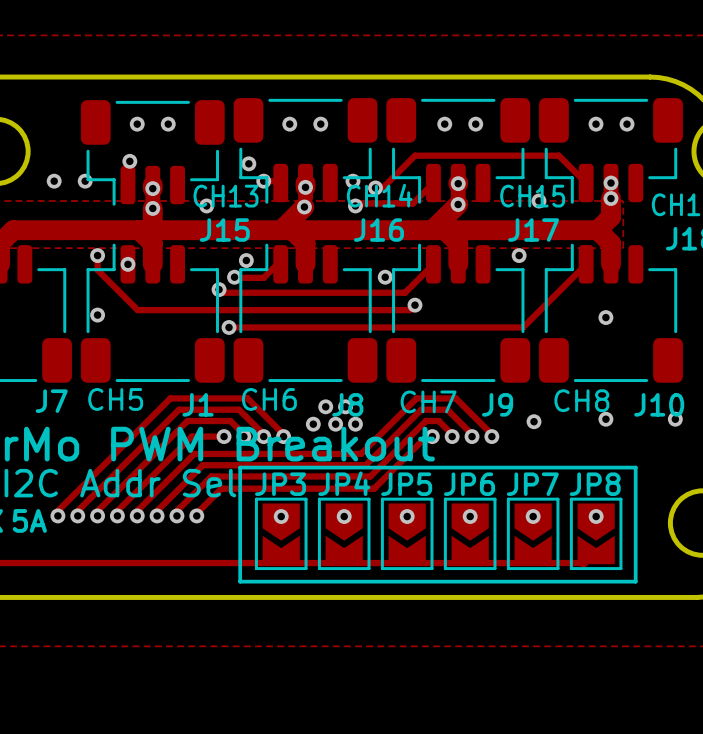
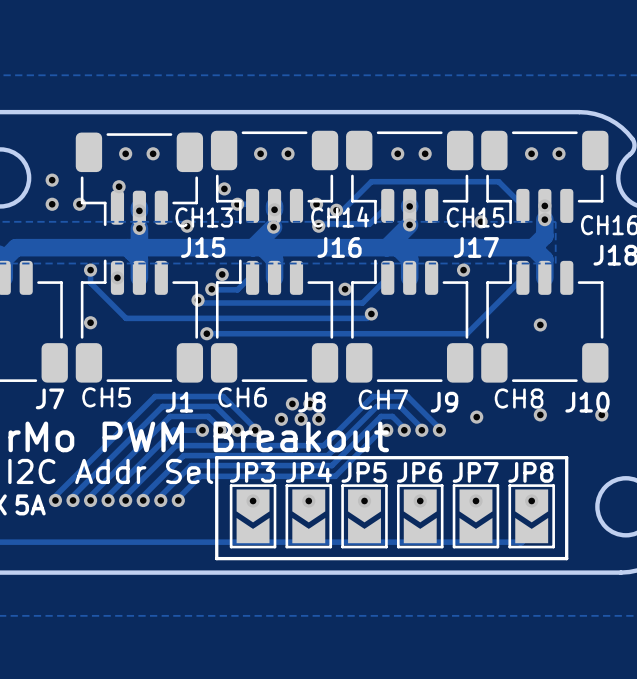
via: none -> (52, 180)

